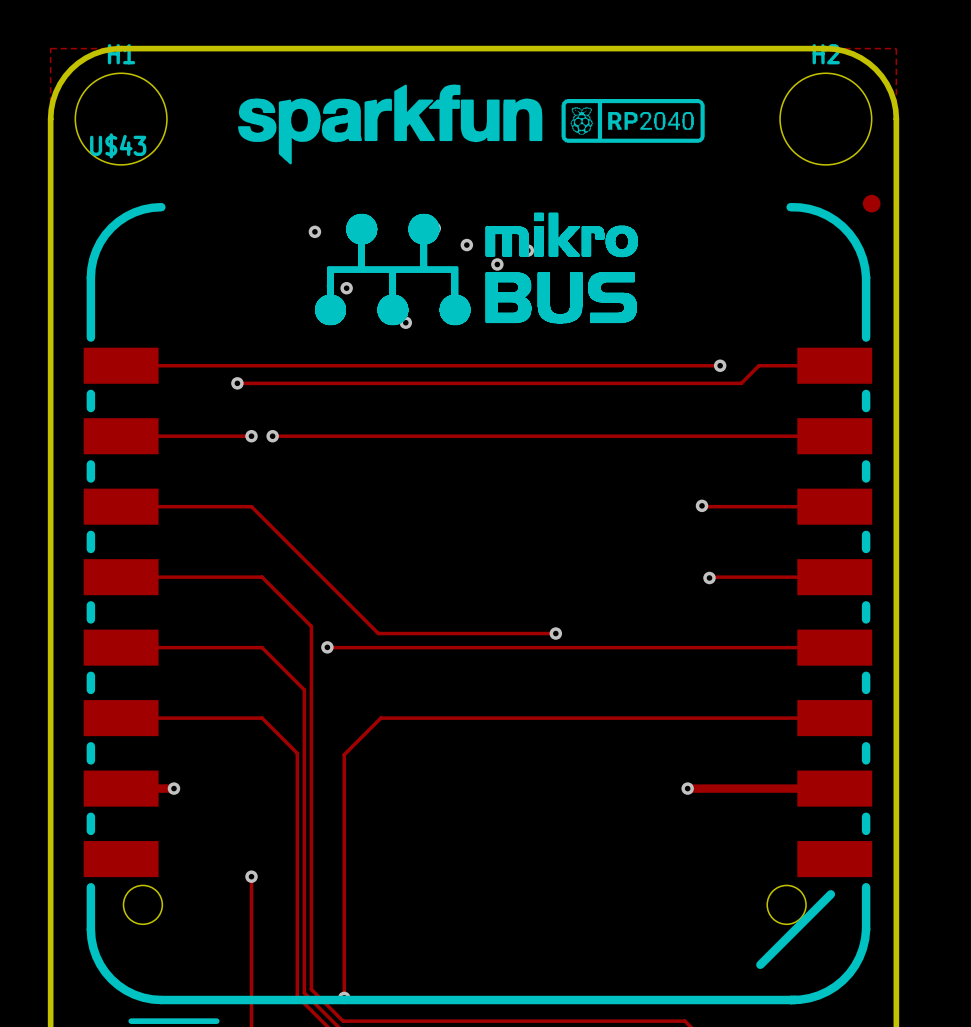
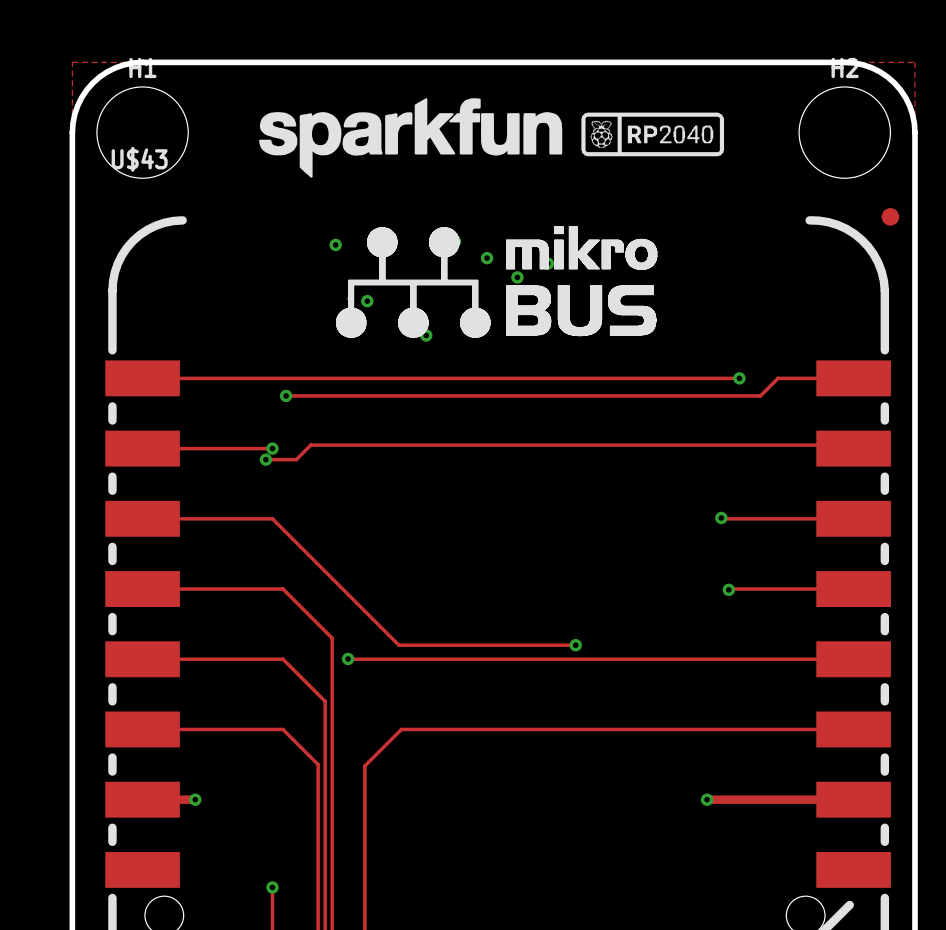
track: (237, 383) (265, 383) -> none
via: (237, 383) -> none
via: none -> (286, 395)
track: none -> (850, 445) (310, 445) (296, 459) (265, 459)
track: (272, 436) (834, 436) -> none
via: (272, 436) -> none
via: none -> (265, 459)

